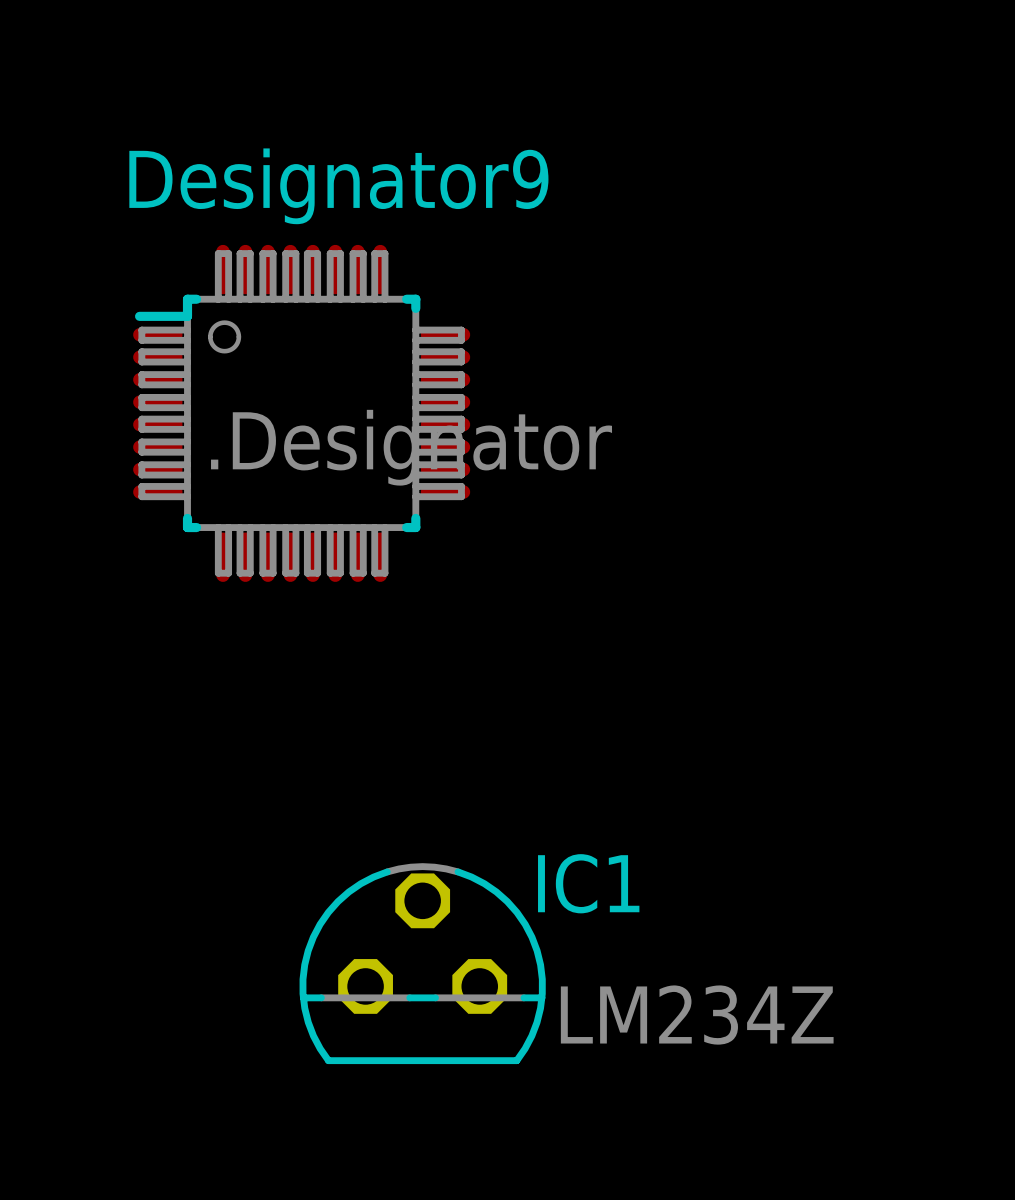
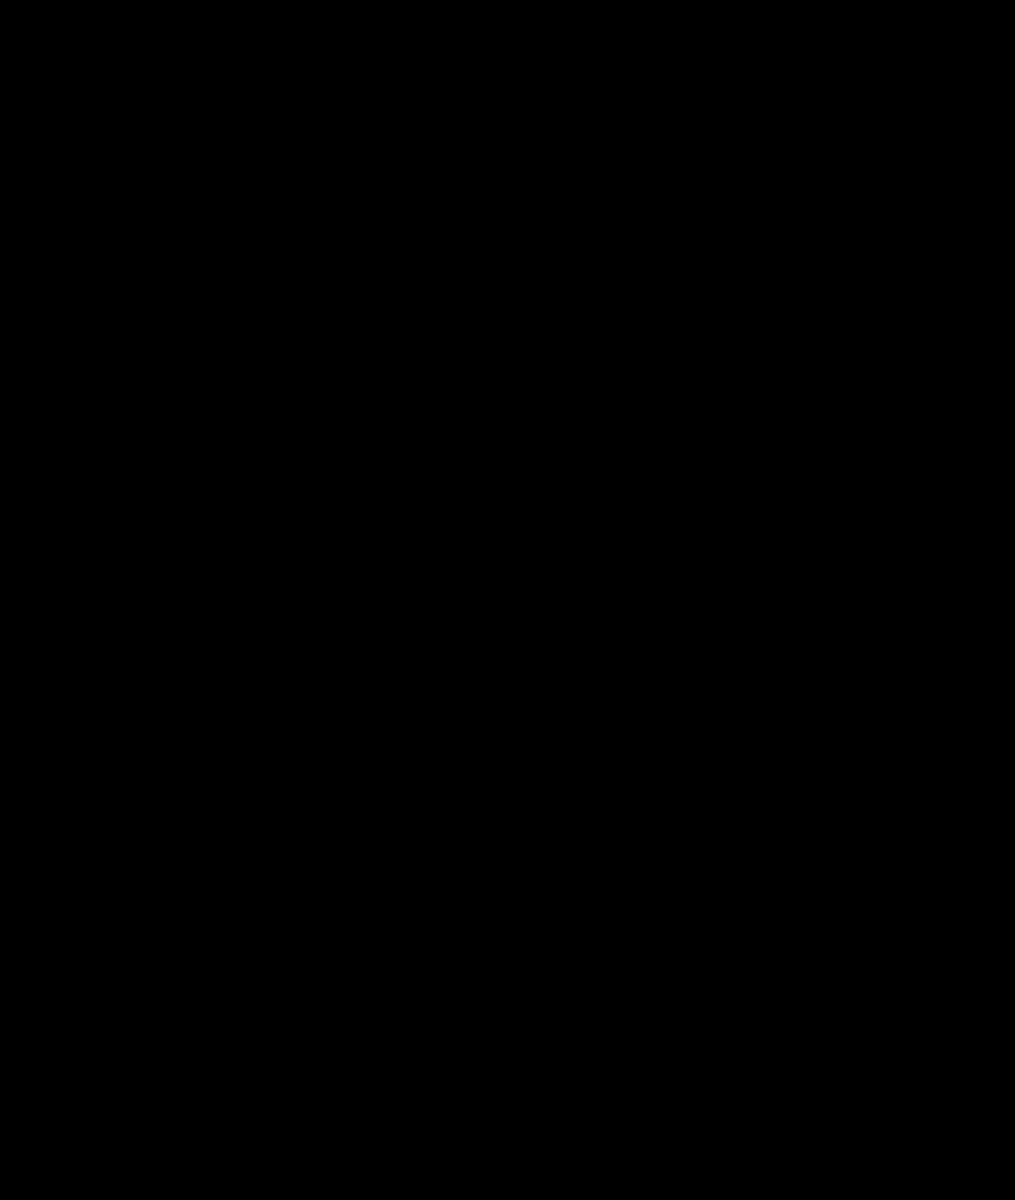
part: (301, 413) -> none
IC1: LM234Z (422, 963) -> none

